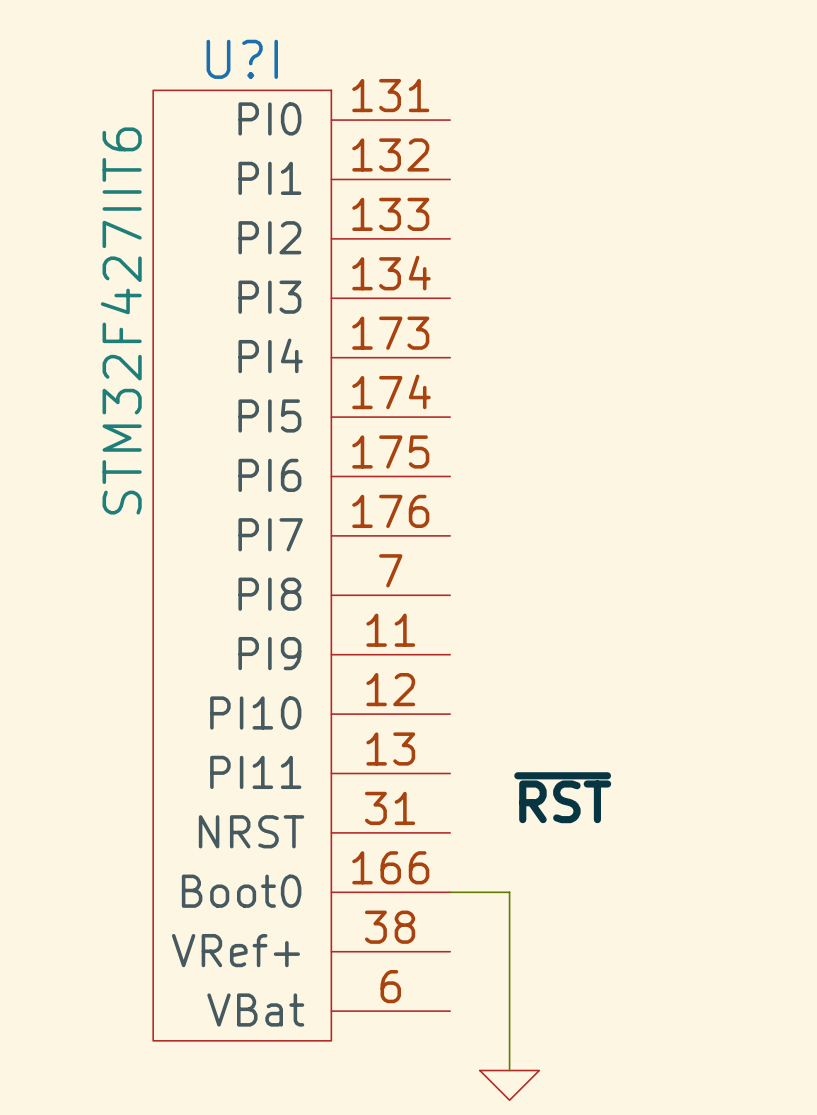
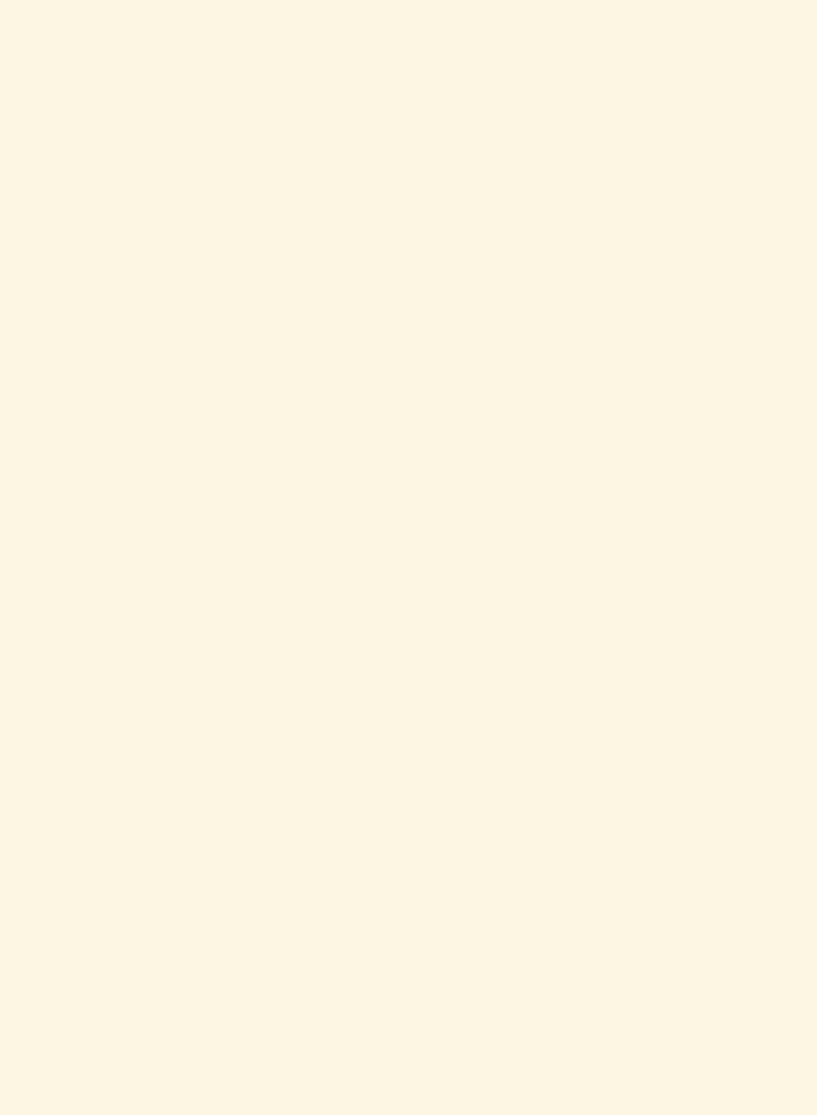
U?I: STM32F427IIT6 (301, 565) -> none
label: ~{RST} (562, 797) -> none
wire: (450, 892) (509, 892) (509, 1070) -> none
power symbol: (509, 1085) -> none

